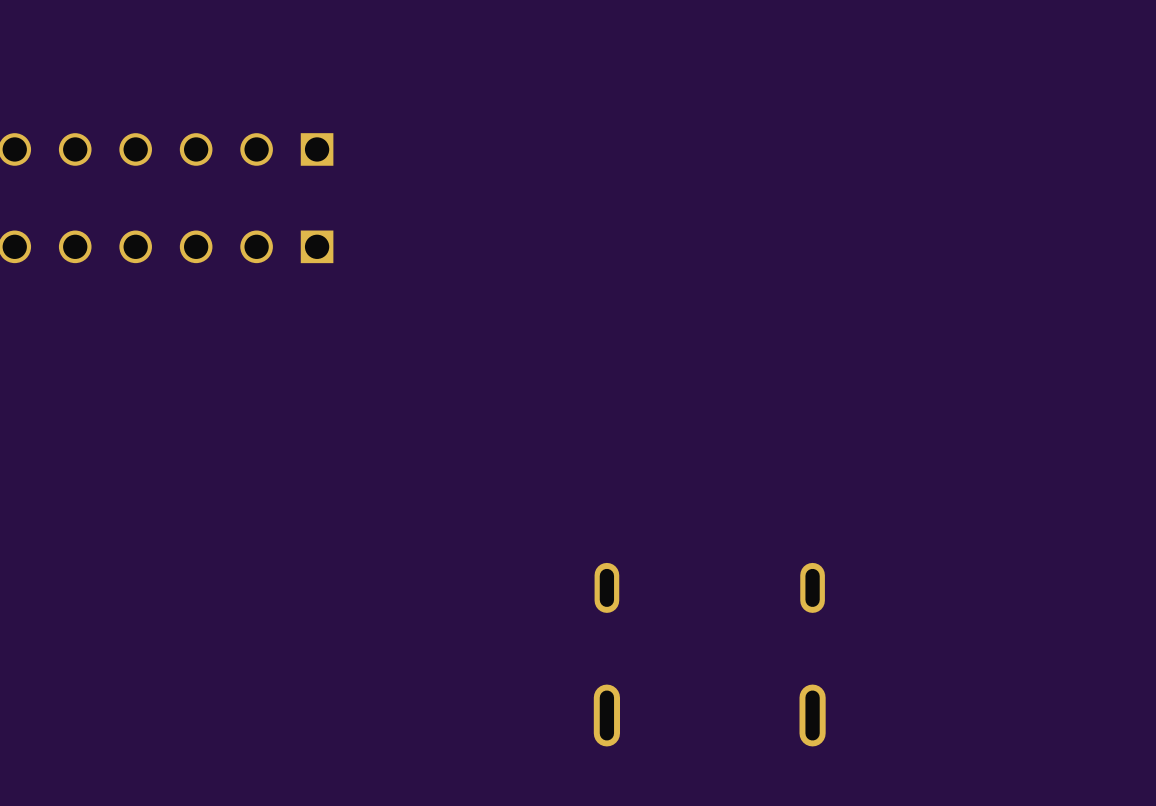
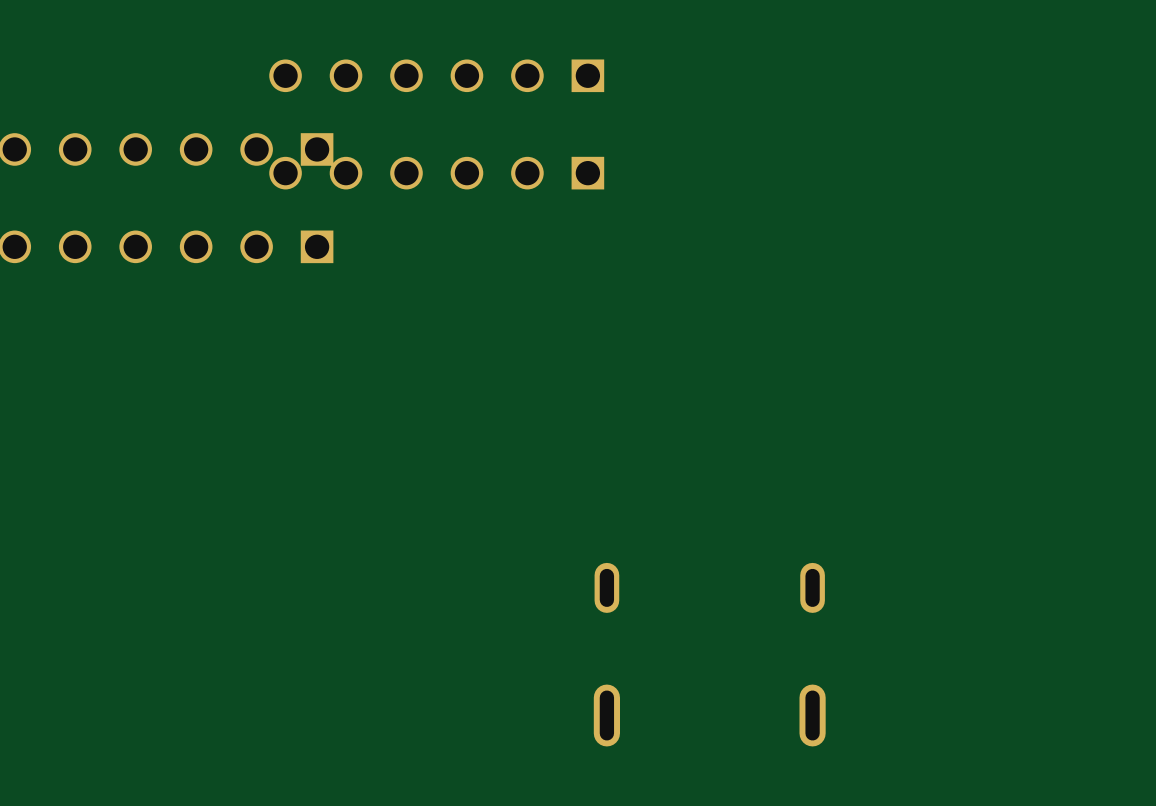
part: none -> (436, 75)
part: none -> (436, 173)

